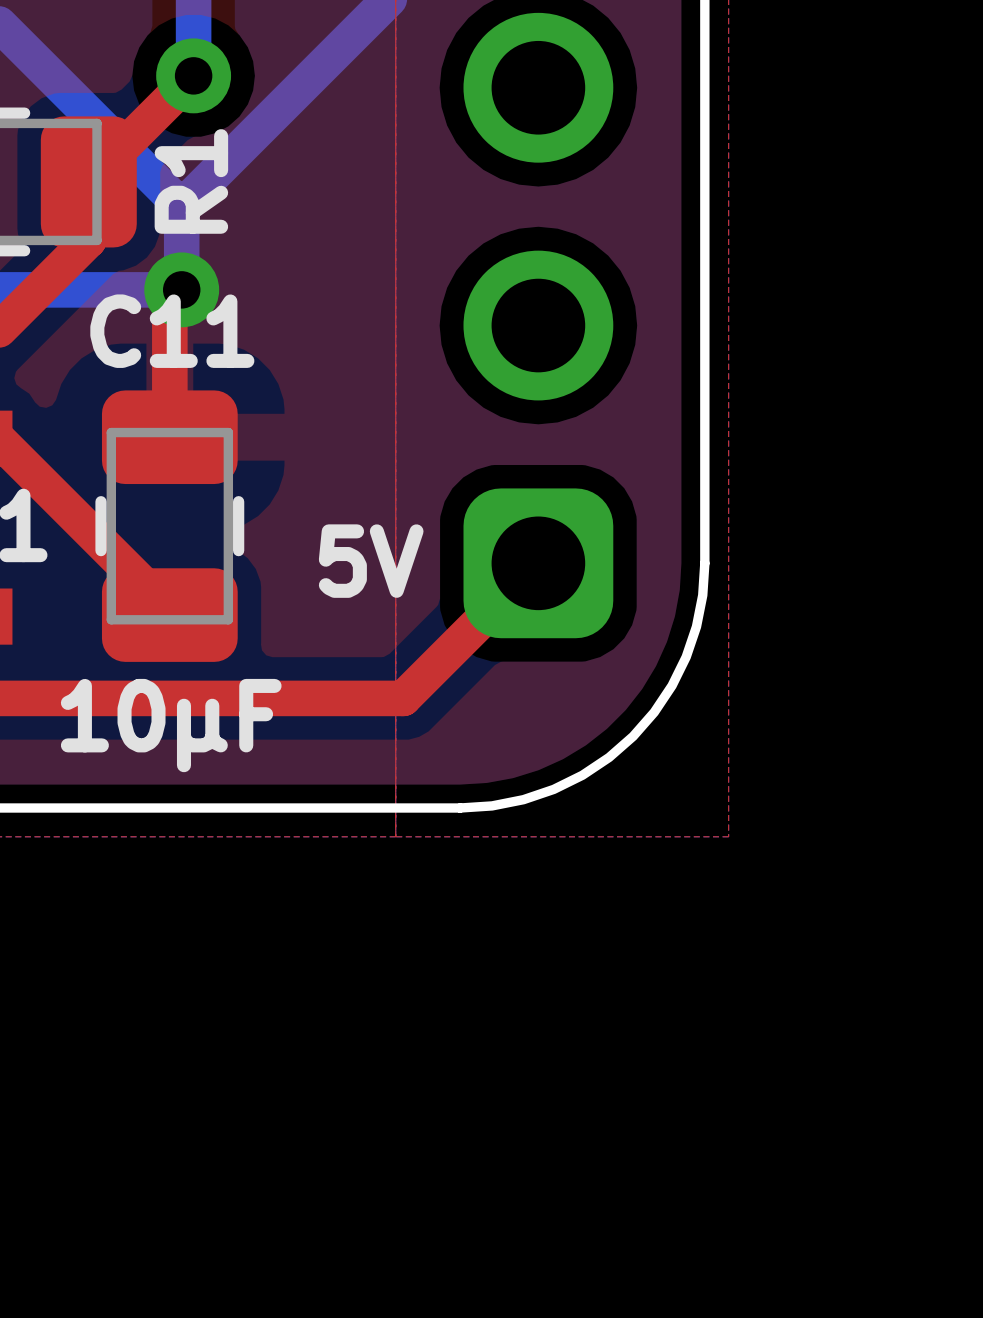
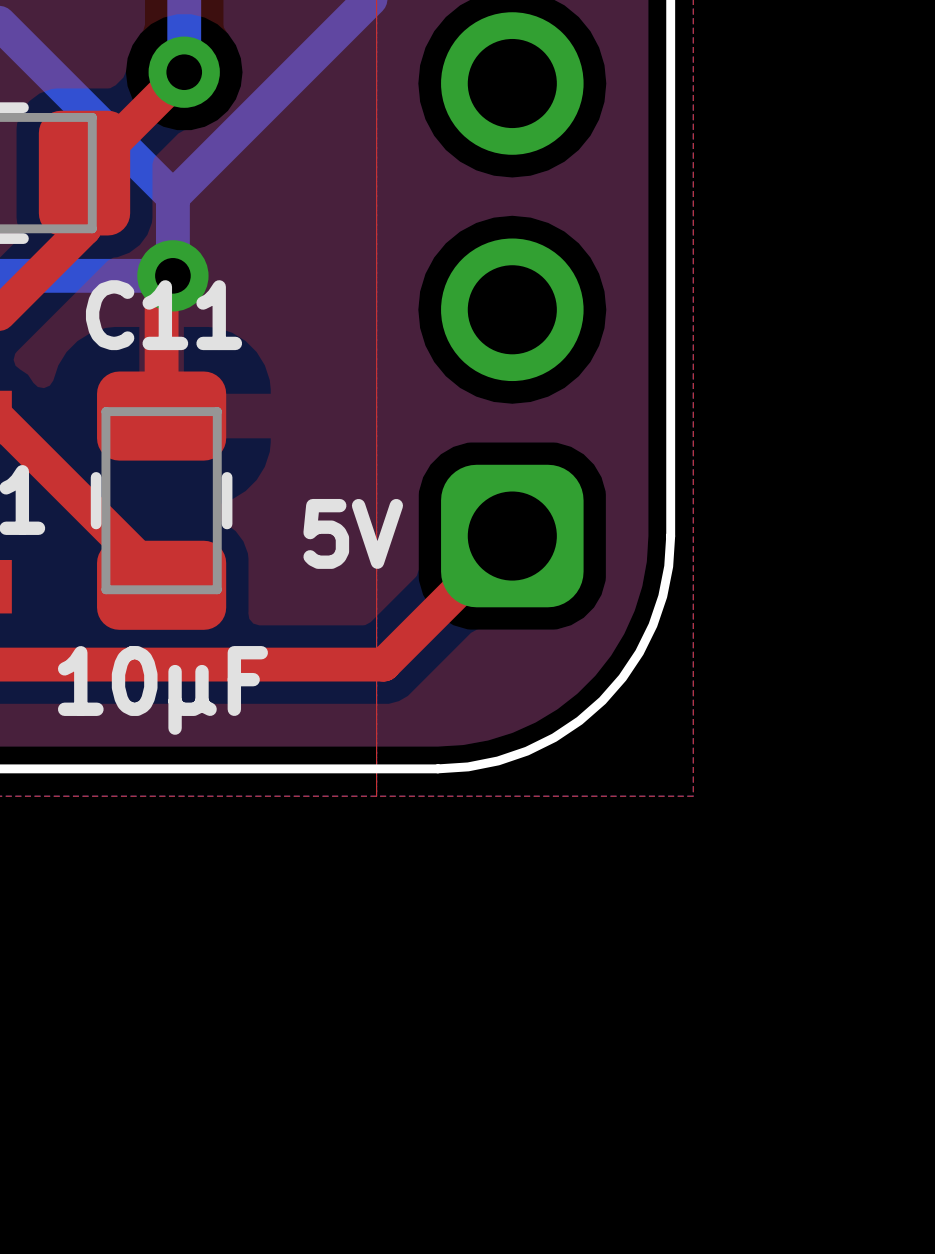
R1 name: R1 (191, 181) -> none

